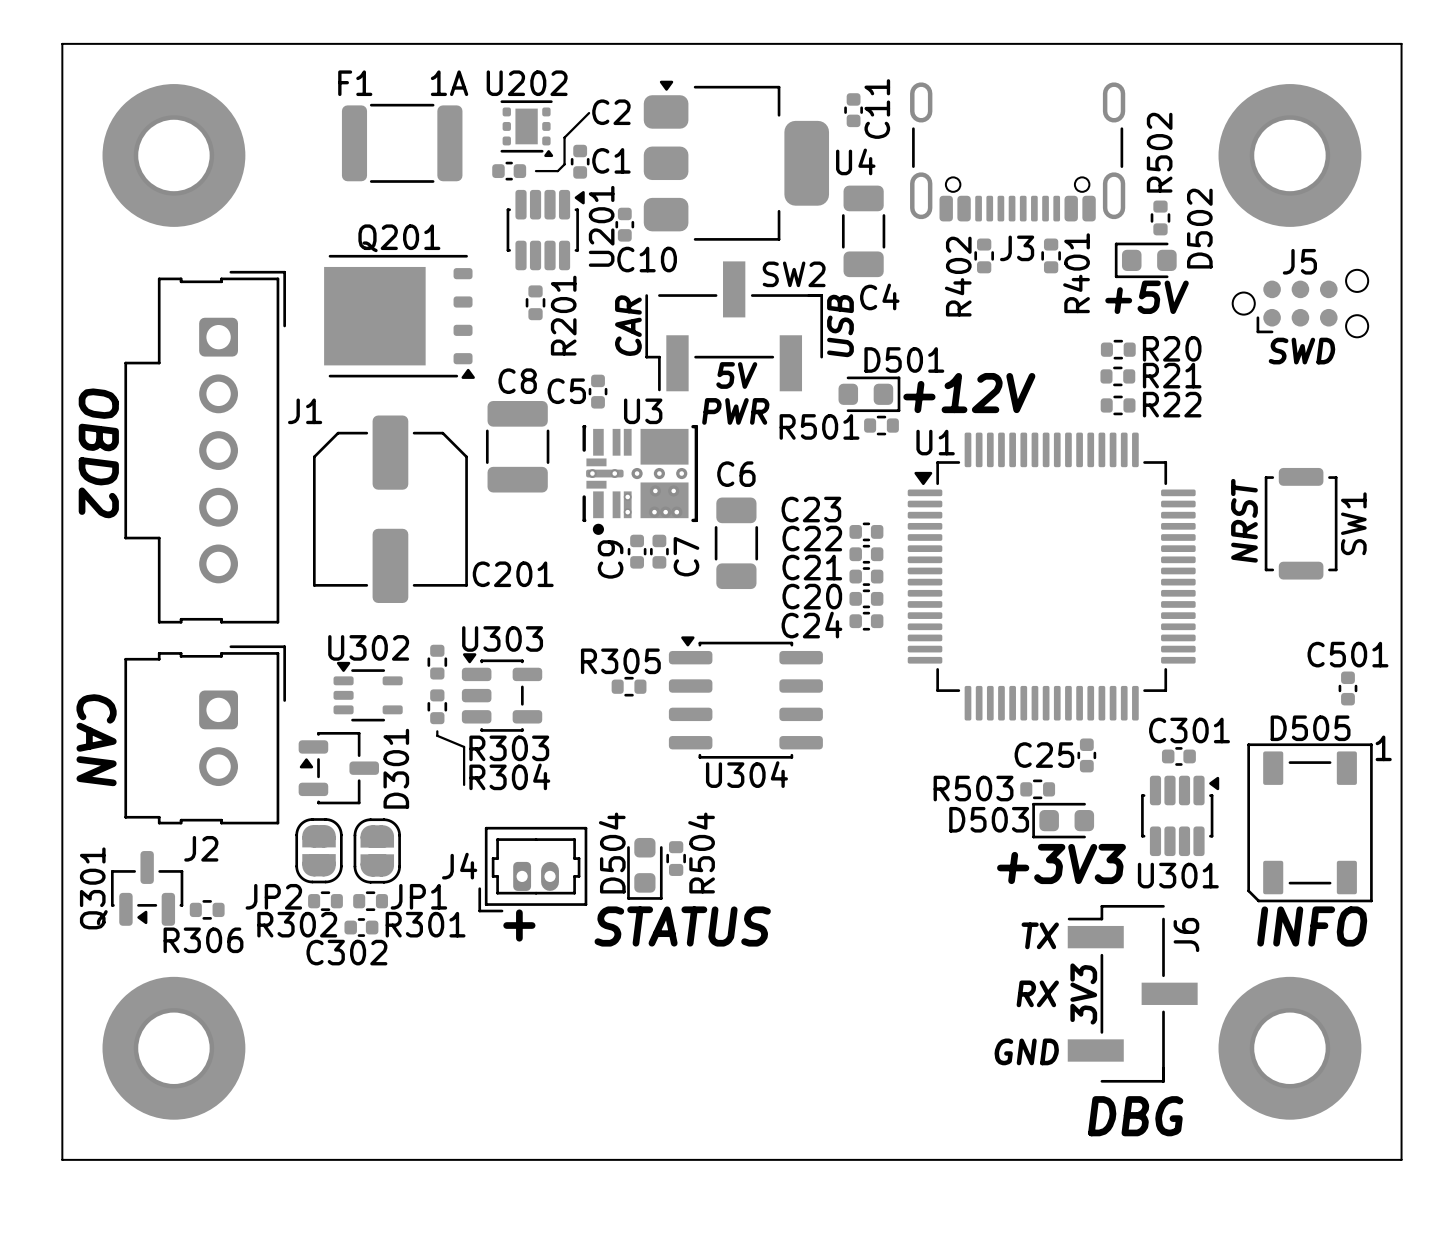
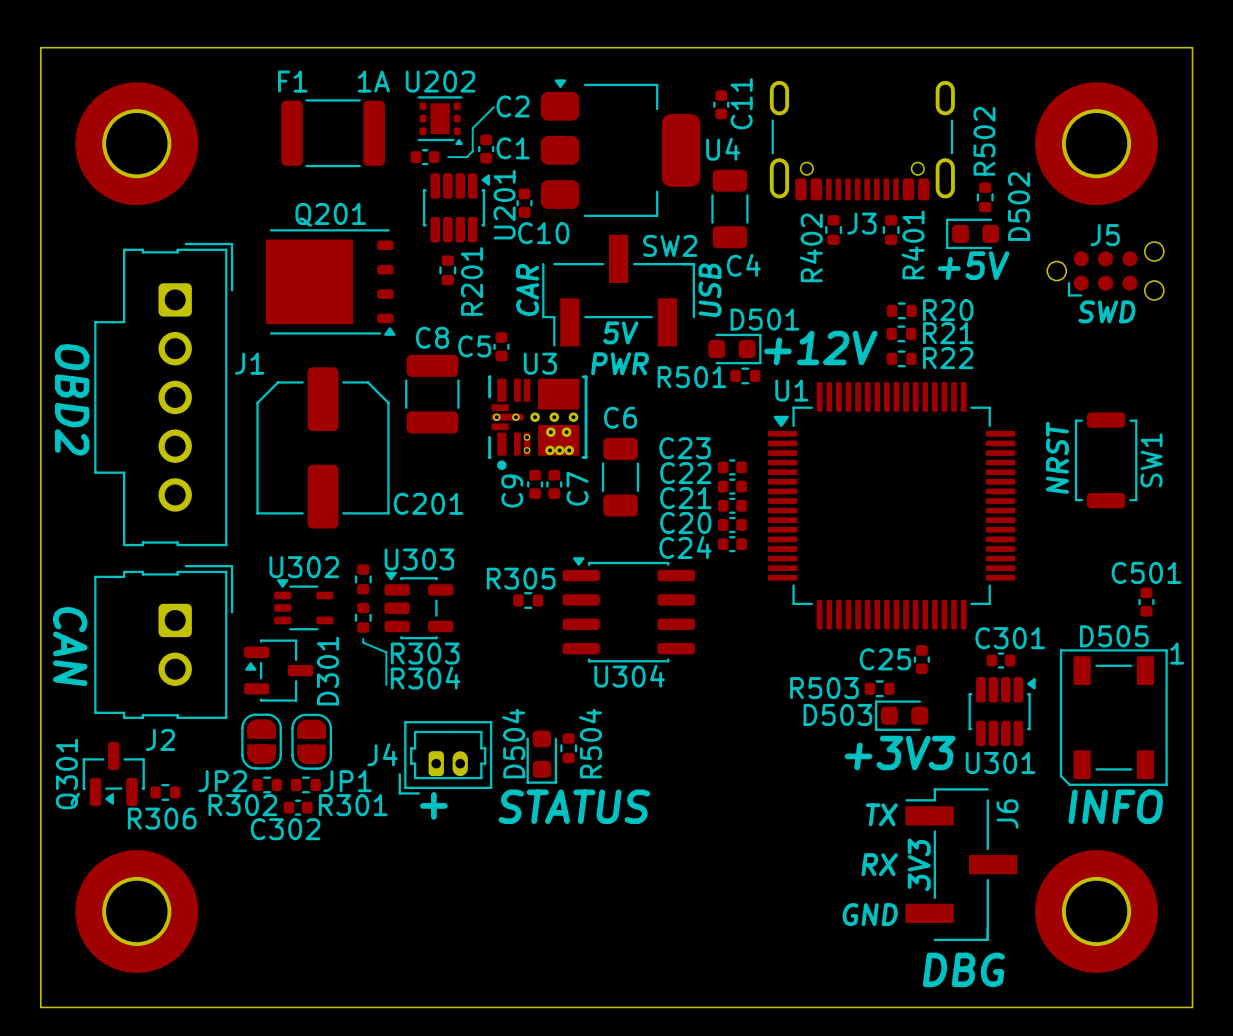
R20 position: (1118, 349) -> (901, 310)
R21 position: (1117, 376) -> (901, 333)
R22 position: (1118, 405) -> (901, 358)

